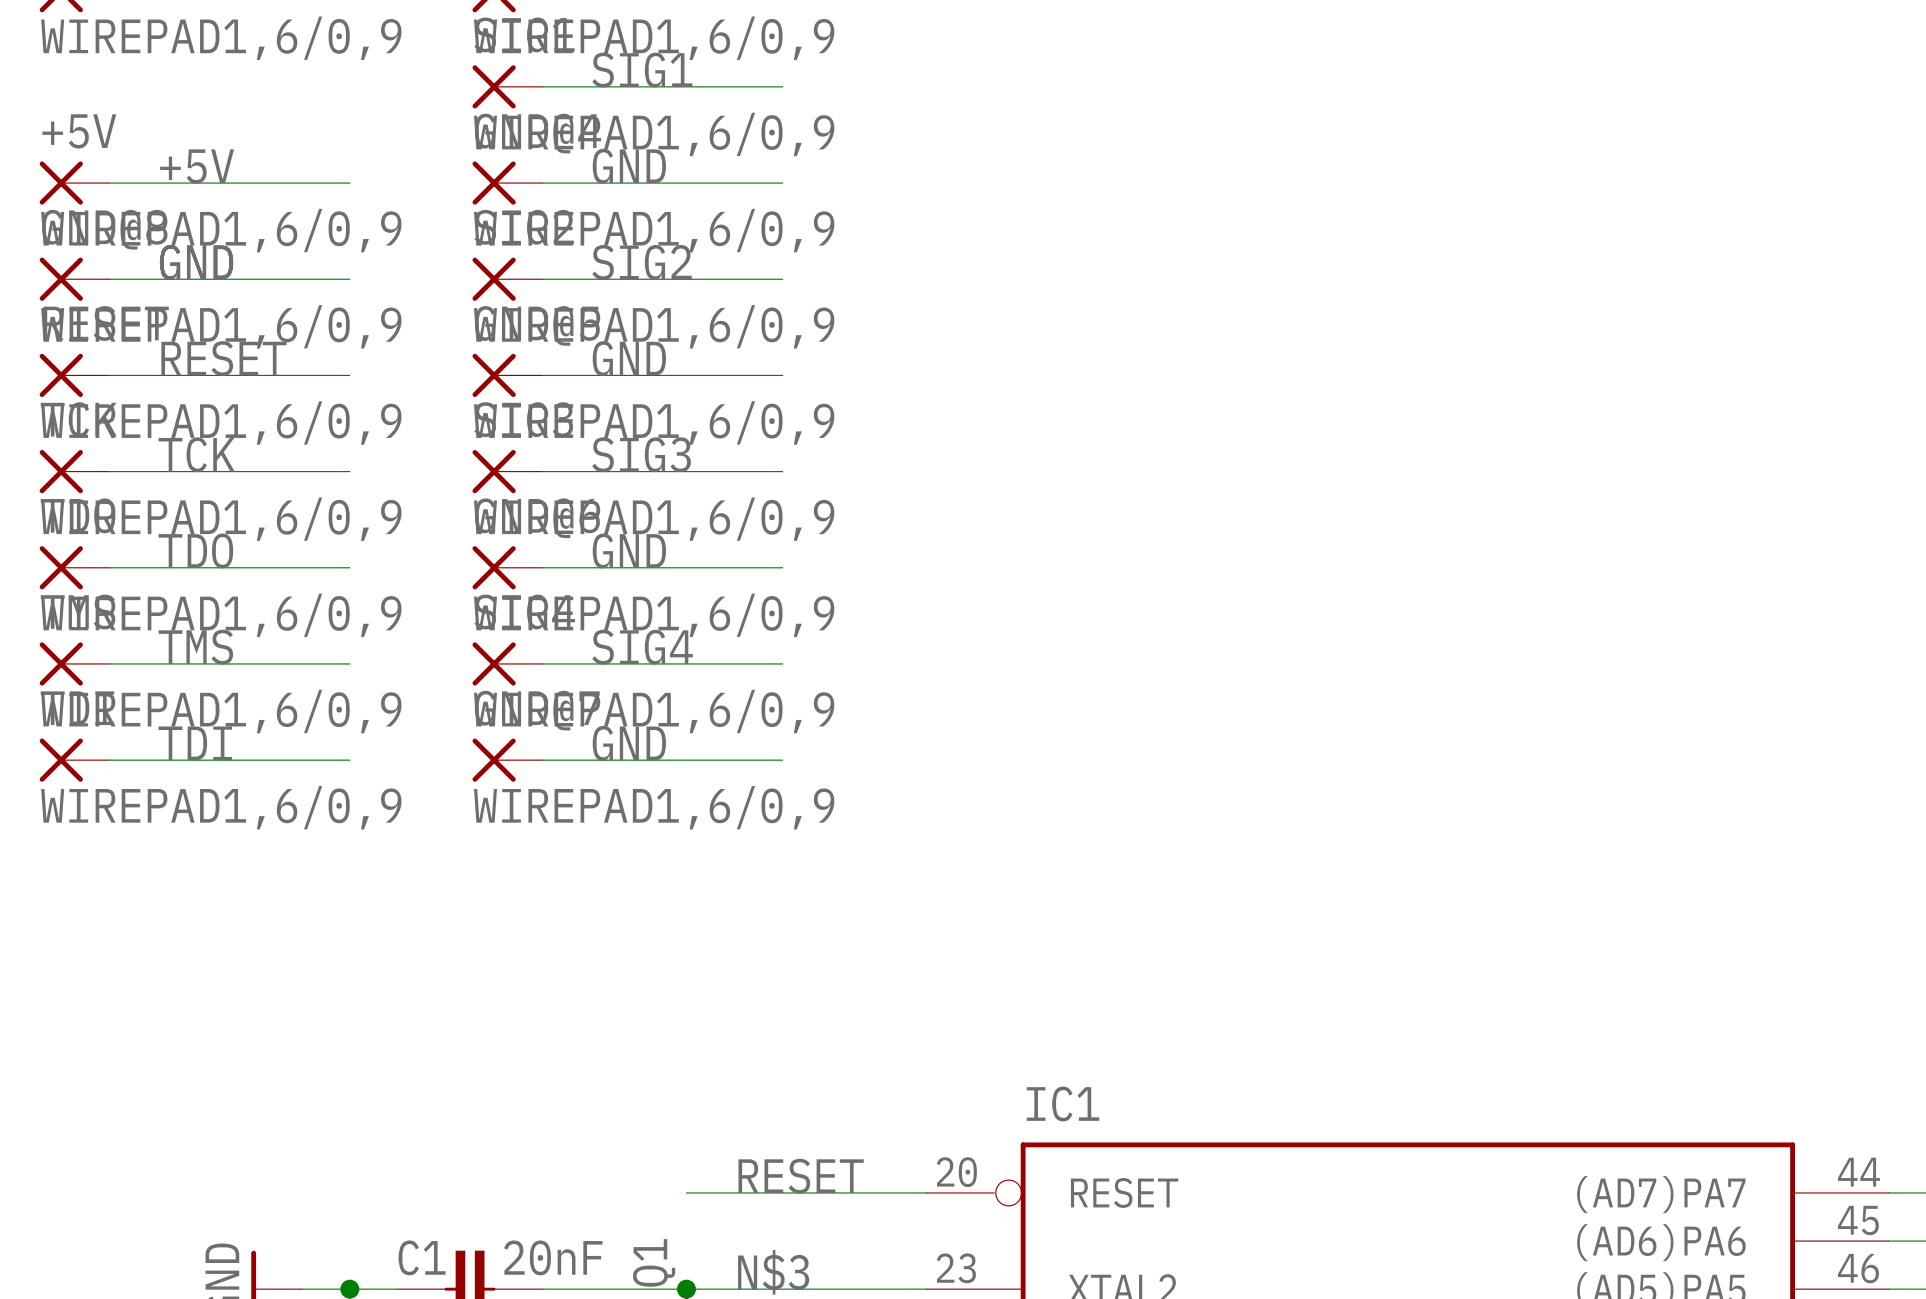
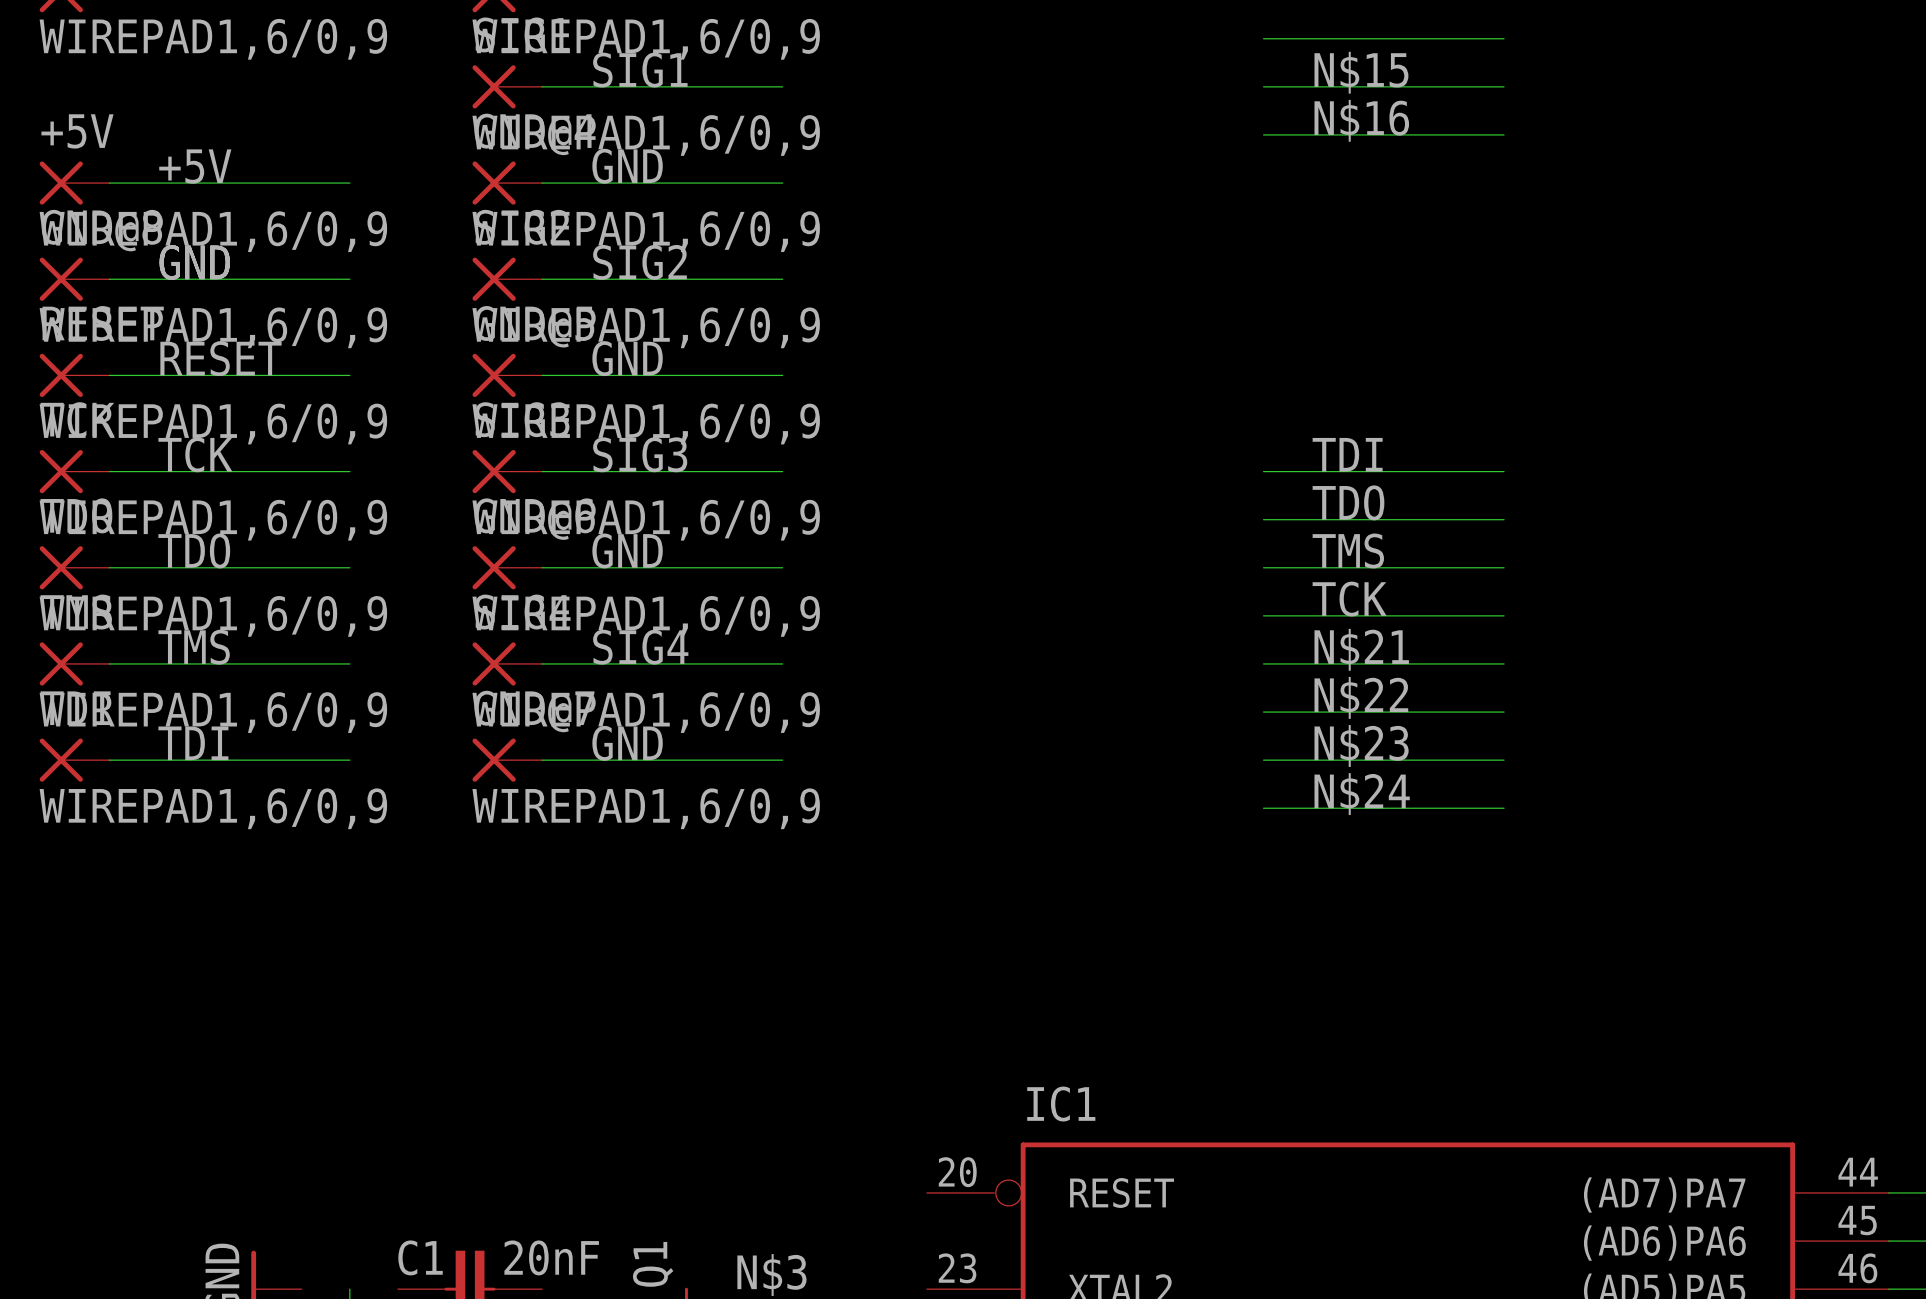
wire: none -> (1263, 38) (1504, 38)
label: none -> N$15 (1361, 72)
wire: none -> (1263, 86) (1504, 86)
label: none -> N$16 (1361, 120)
wire: none -> (1263, 134) (1504, 134)
label: none -> TDI (1347, 454)
wire: none -> (1263, 471) (1504, 471)
label: none -> TDO (1348, 502)
wire: none -> (1263, 519) (1504, 519)
label: none -> TMS (1348, 550)
wire: none -> (1263, 567) (1504, 567)
label: none -> TCK (1349, 599)
wire: none -> (1263, 615) (1504, 615)
label: none -> N$21 (1361, 649)
wire: none -> (1263, 663) (1504, 663)
label: none -> N$22 (1361, 697)
wire: none -> (1263, 712) (1504, 712)
label: none -> N$23 (1361, 746)
wire: none -> (1263, 760) (1504, 760)
label: none -> N$24 (1362, 794)
wire: none -> (1263, 808) (1504, 808)
label: RESET (801, 1176) -> none
wire: (686, 1192) (926, 1192) -> none
wire: (301, 1289) (397, 1289) -> none
junction: (349, 1289) -> none
wire: (542, 1289) (926, 1289) -> none
junction: (686, 1289) -> none

